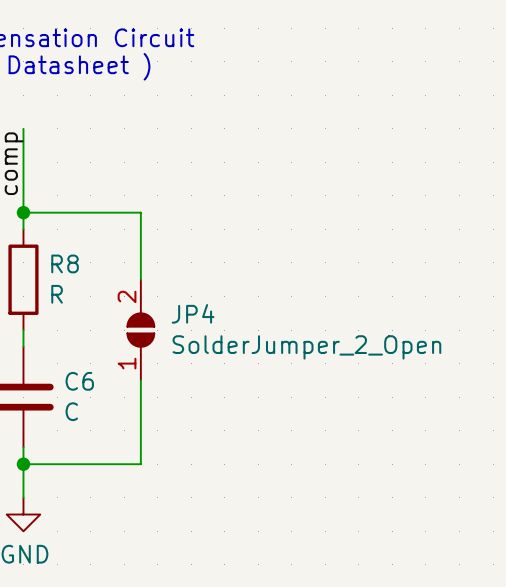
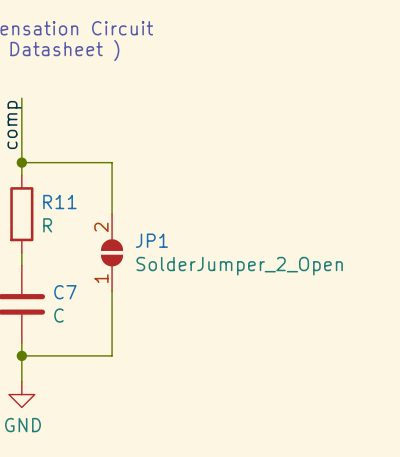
R8 name: R8 (65, 263) -> R11 (59, 202)
JP4 name: JP4 (193, 313) -> JP1 (151, 240)
C6 name: C6 (79, 381) -> C7 (65, 292)

